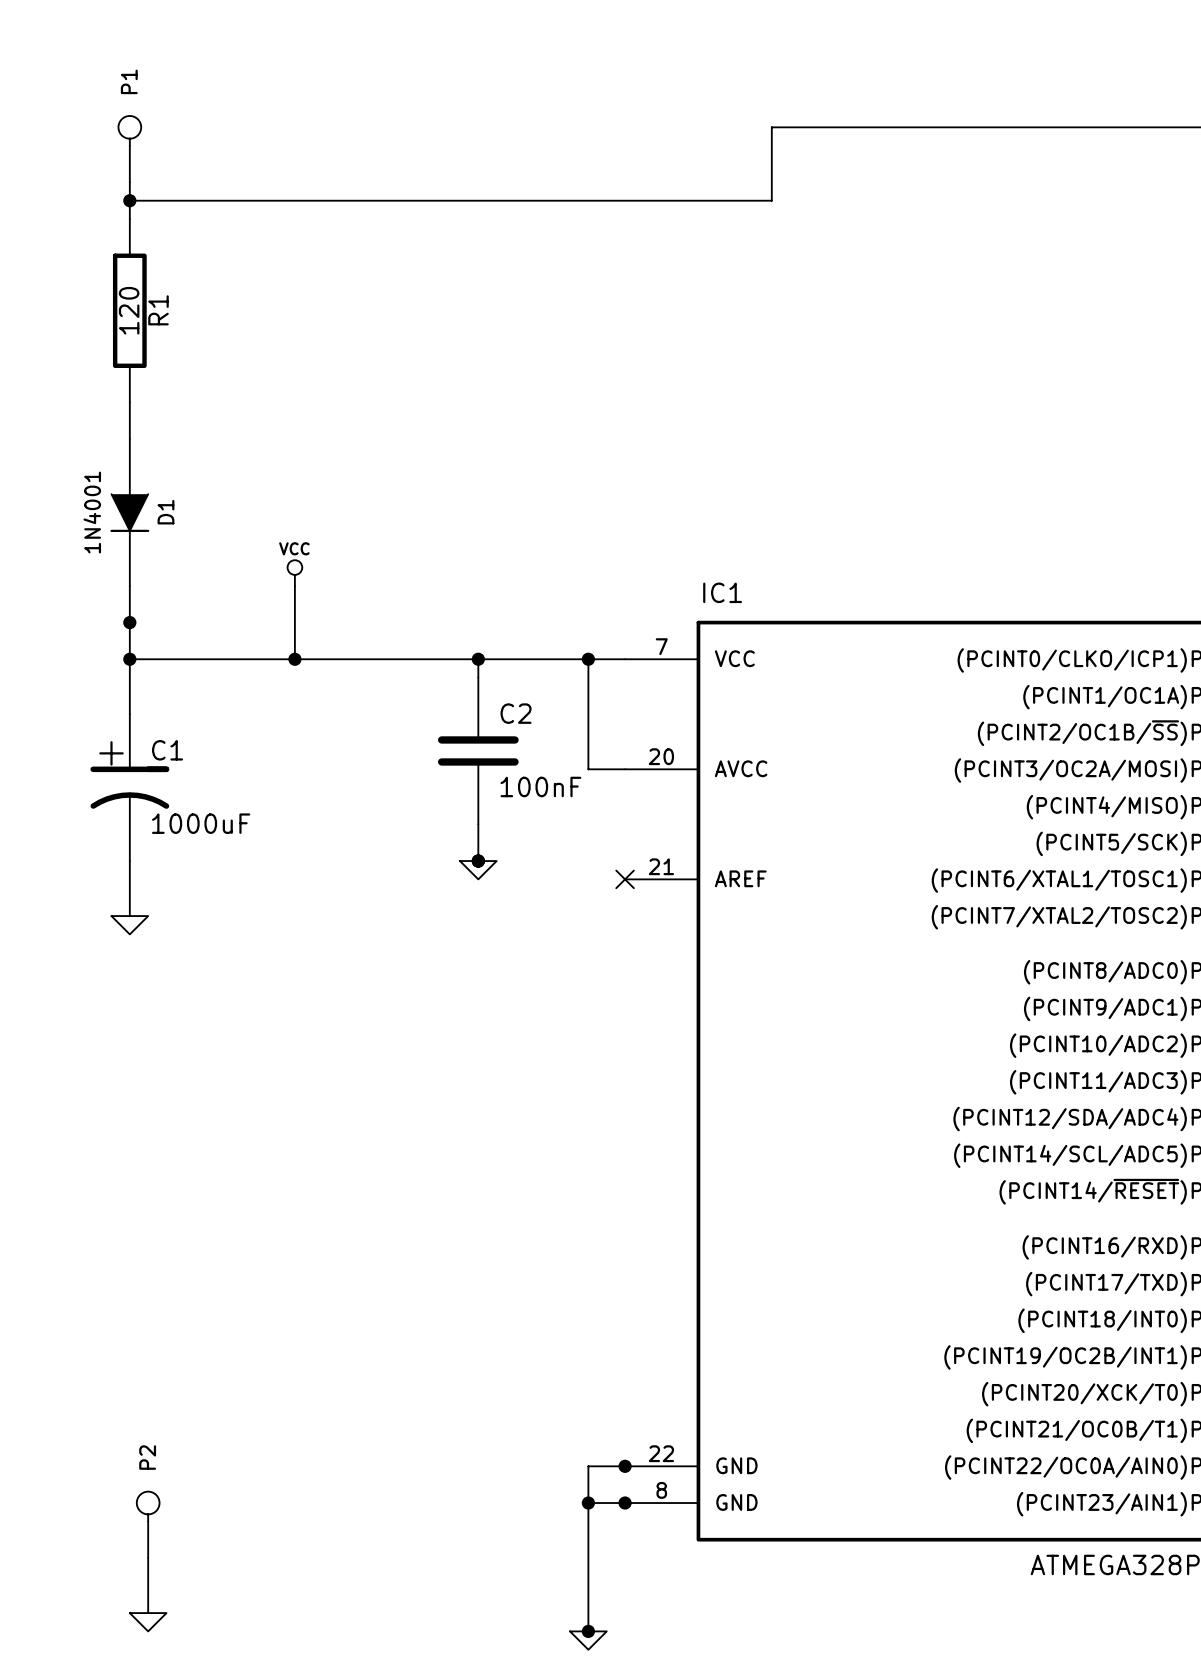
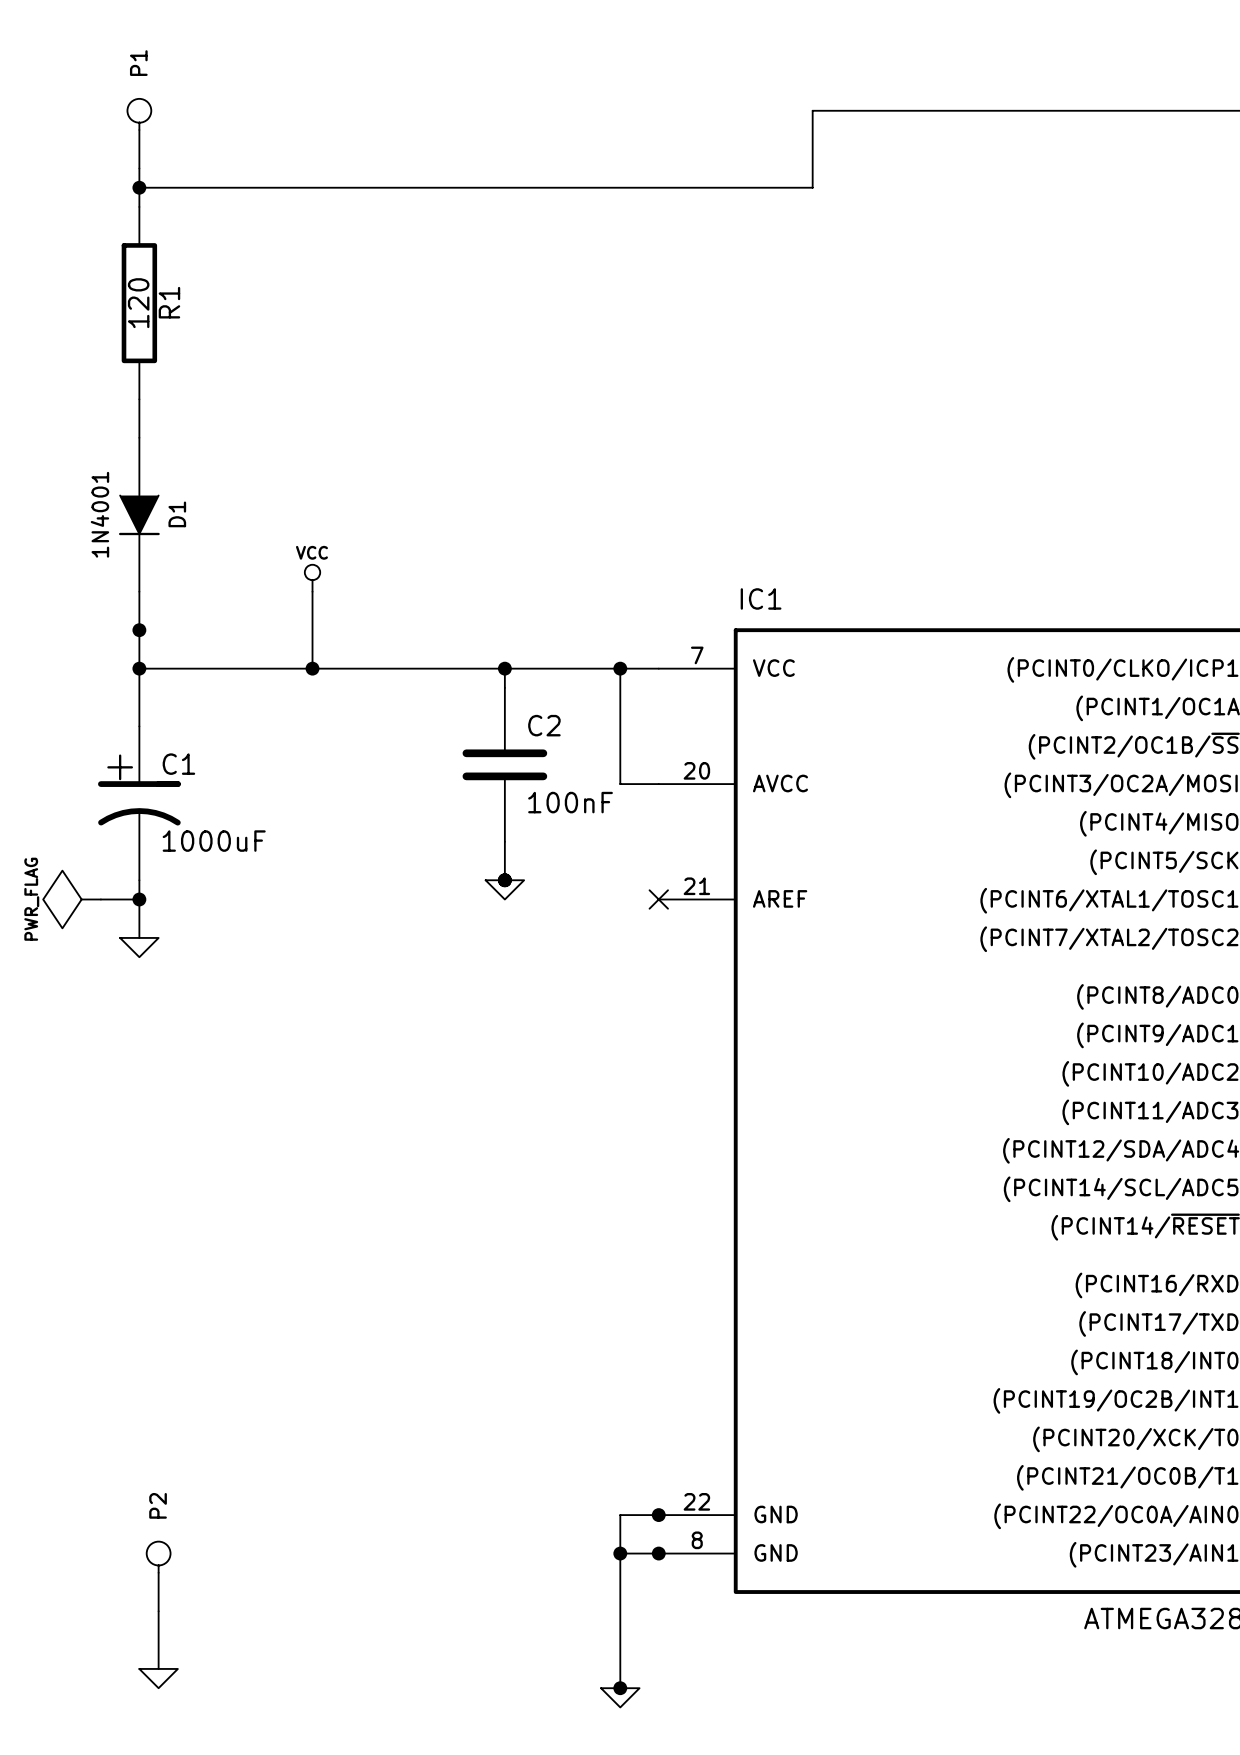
power symbol: none -> PWR_FLAG (72, 899)
wire: none -> (100, 899) (139, 899)
junction: none -> (139, 899)

